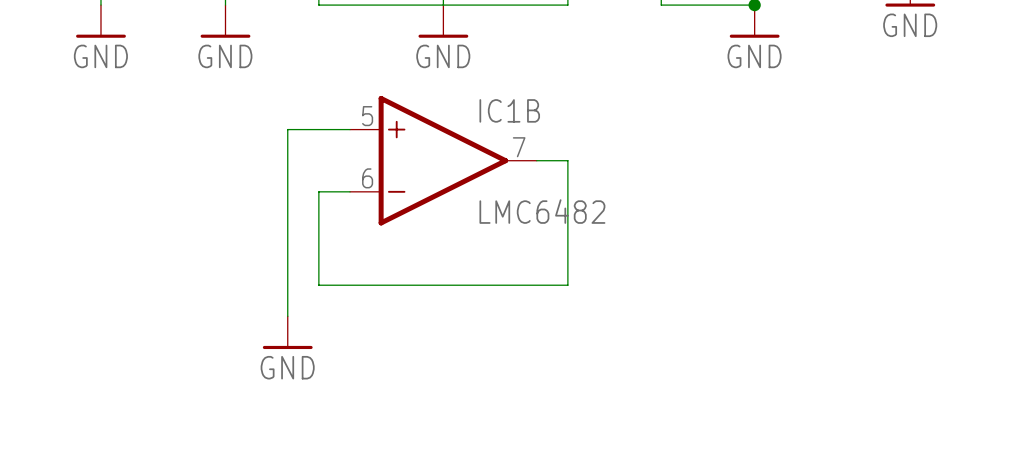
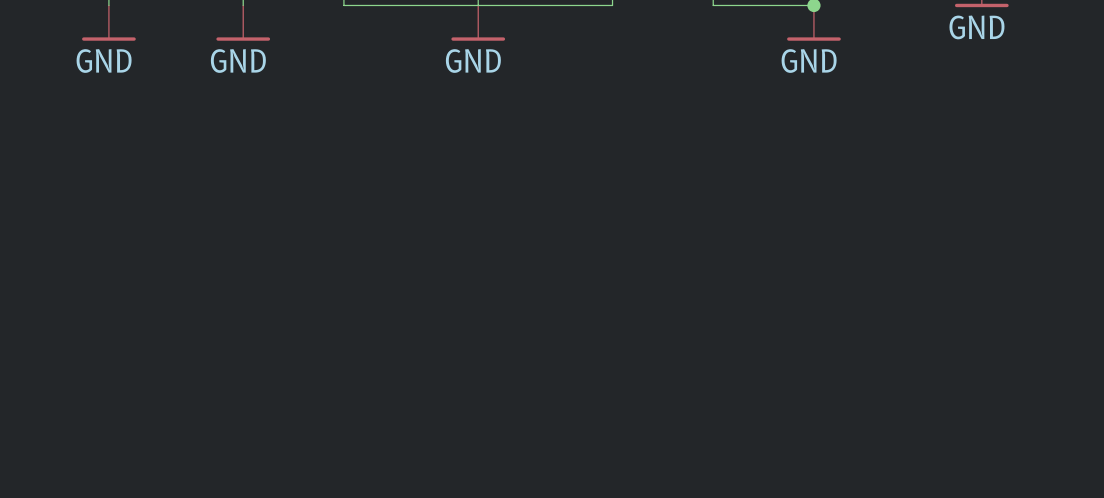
wire: (350, 129) (287, 129) (287, 316) -> none
IC1B: LMC6482 (443, 160) -> none
wire: (536, 160) (567, 160) (567, 285) (318, 285) (318, 191) (350, 191) -> none
power symbol: GND (287, 332) -> none

